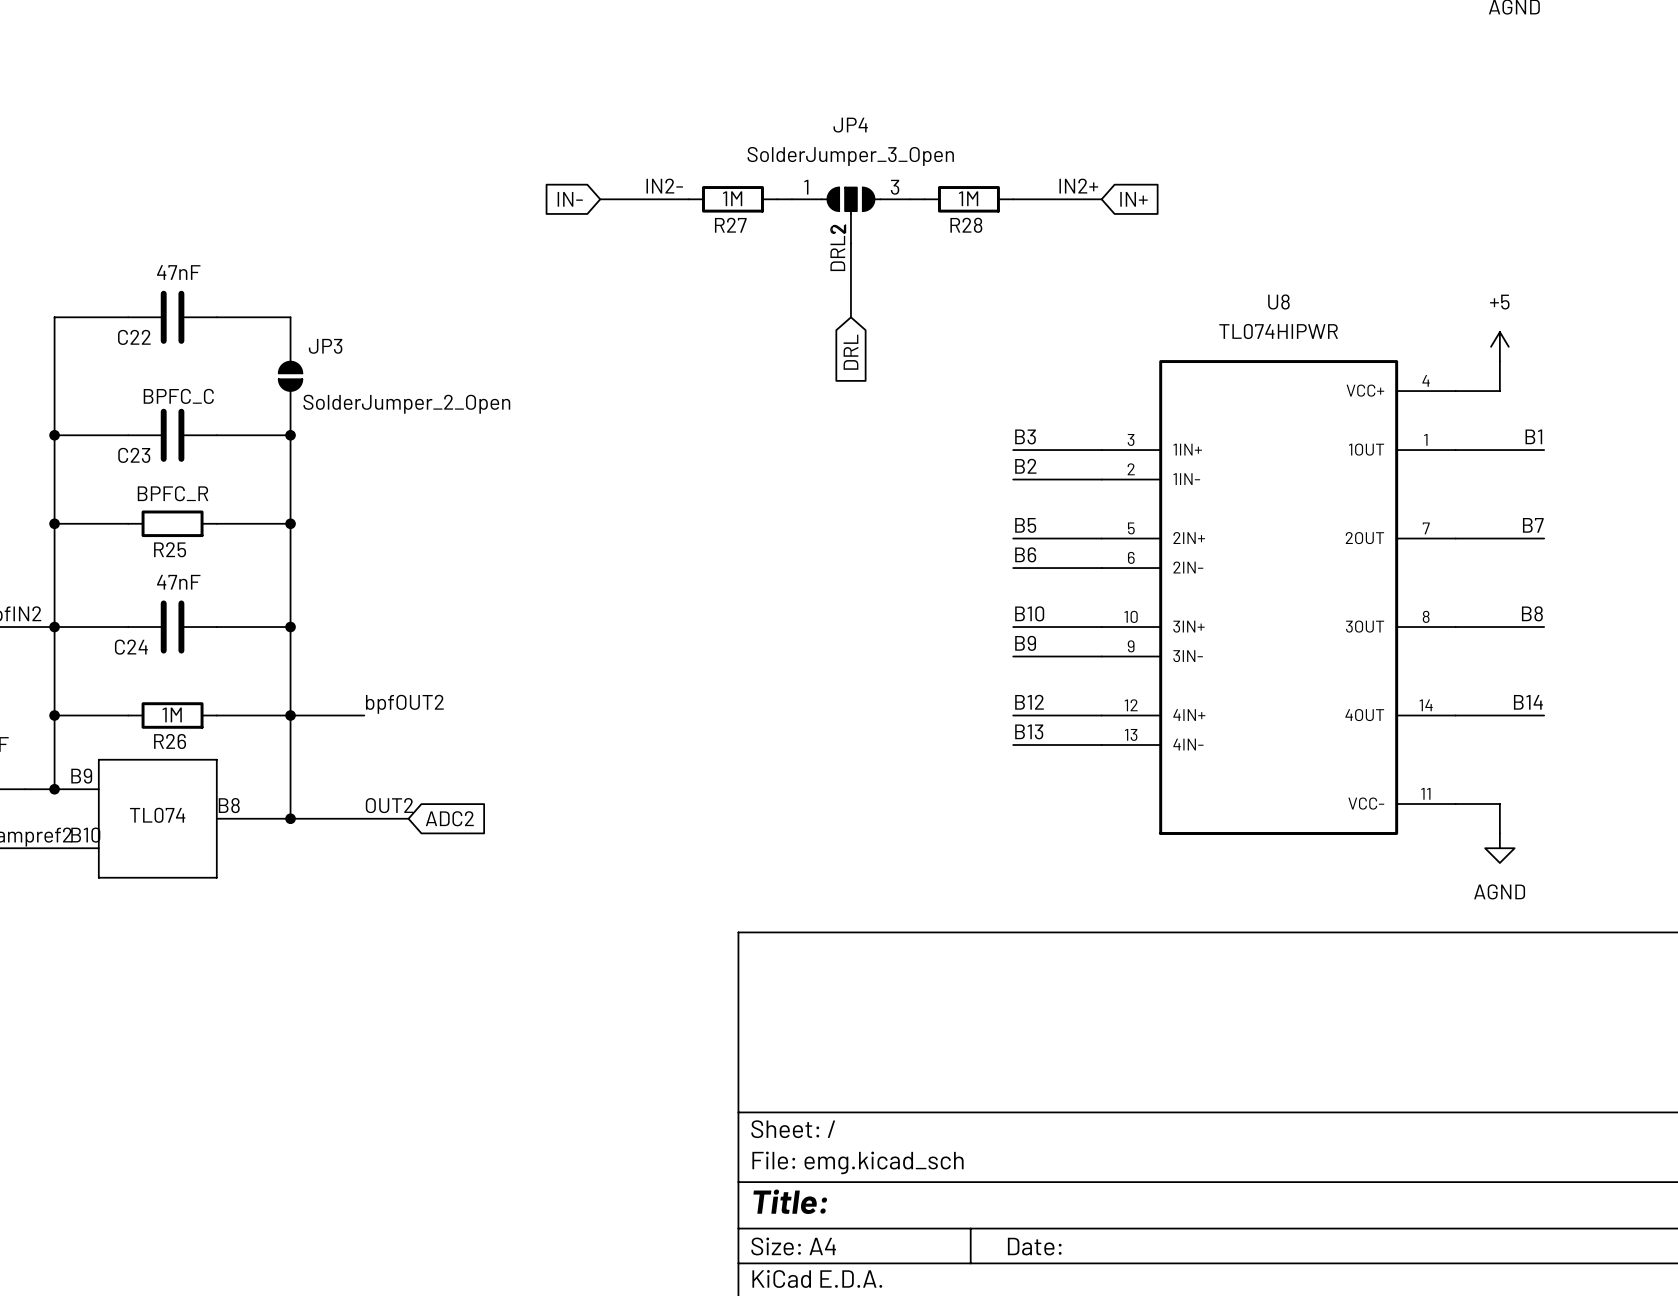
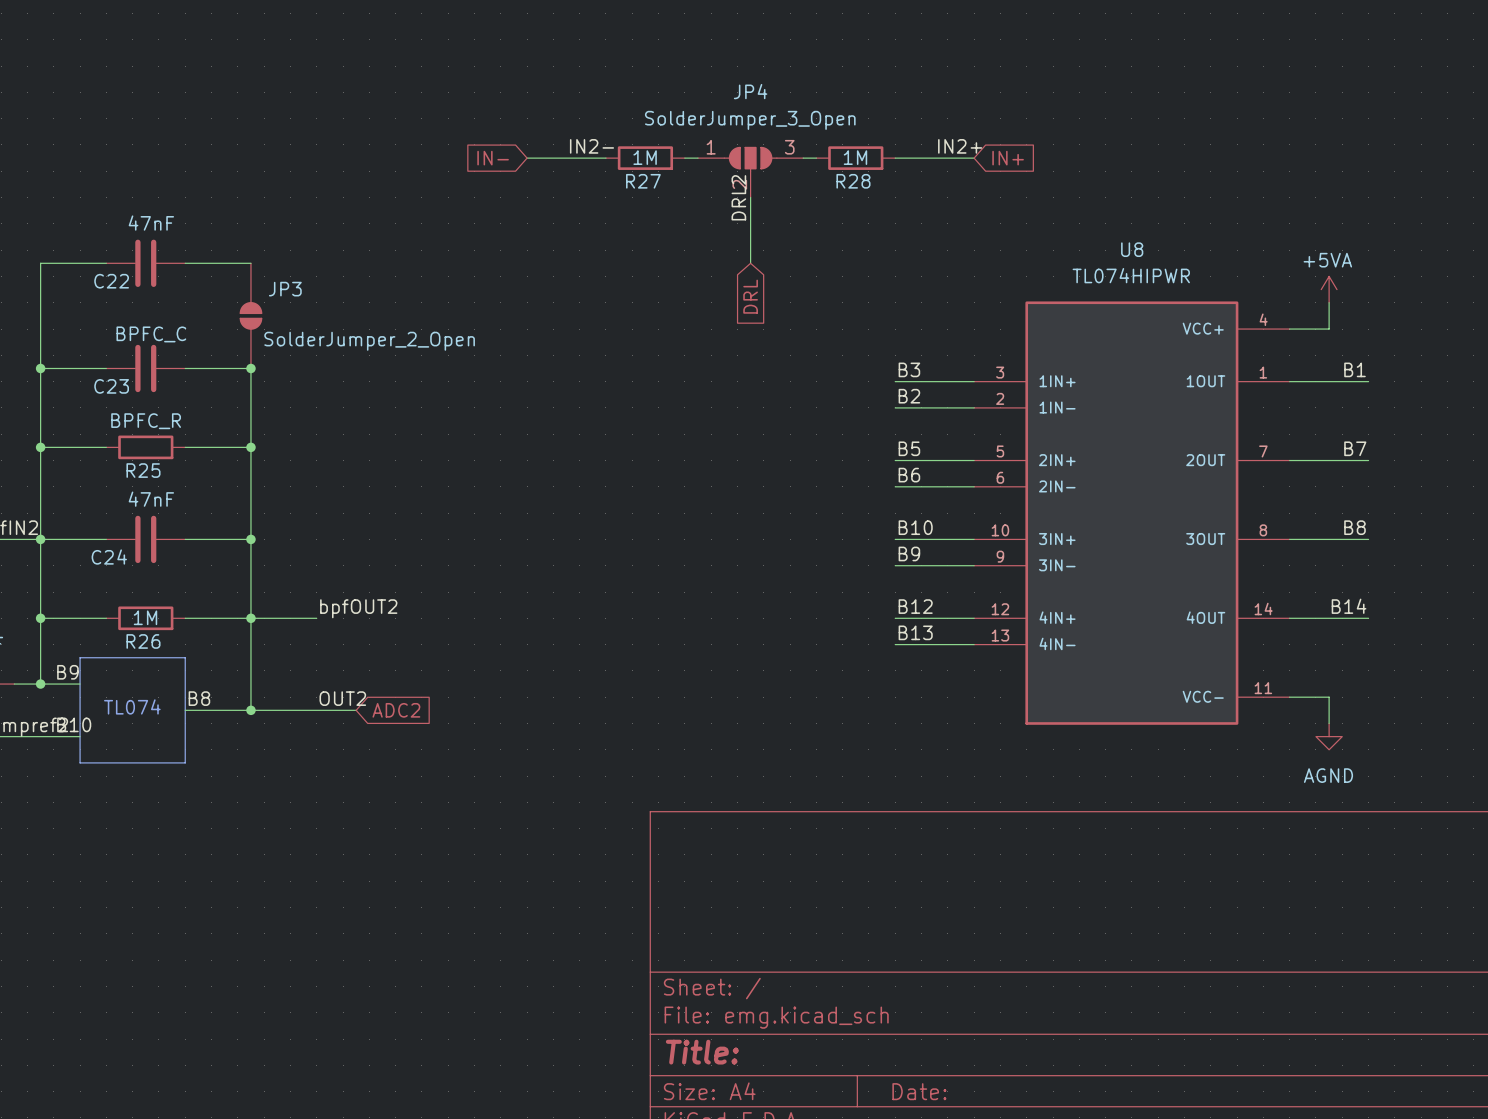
power symbol: +5 (1499, 346) -> +5VA (1329, 289)

